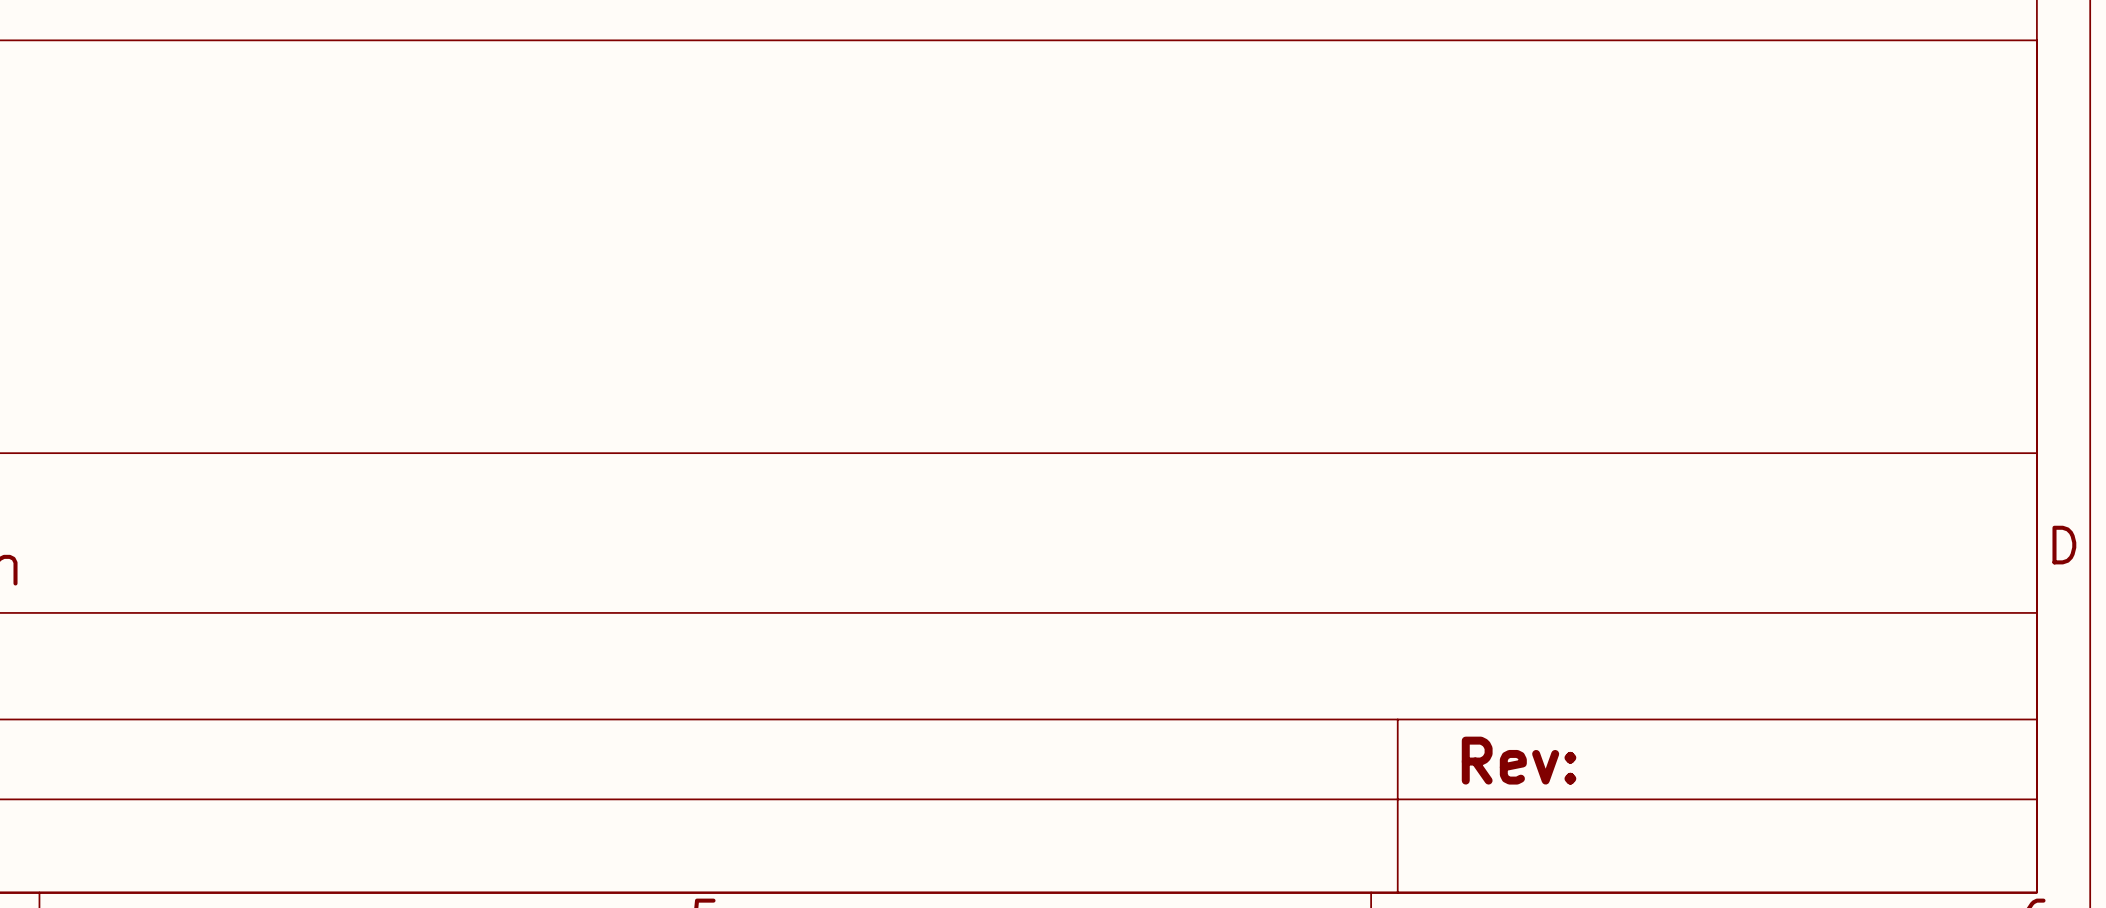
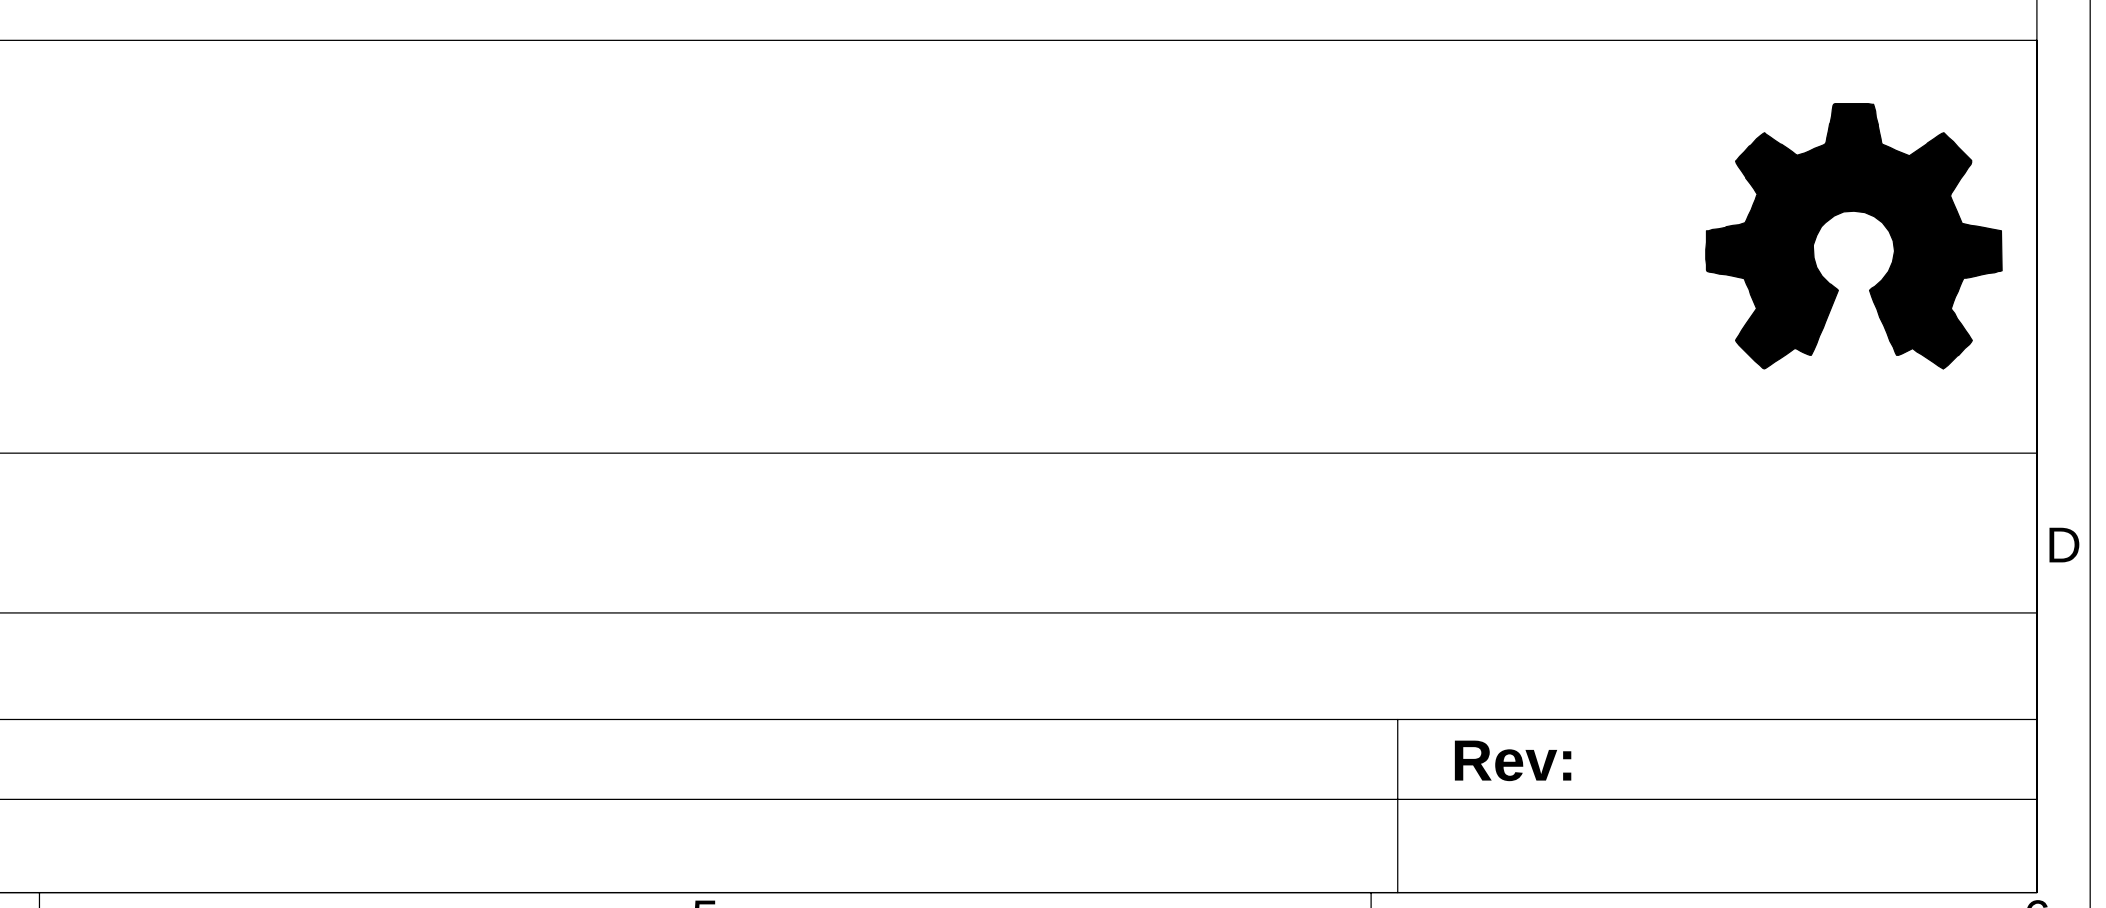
power symbol: none -> (1853, 236)

